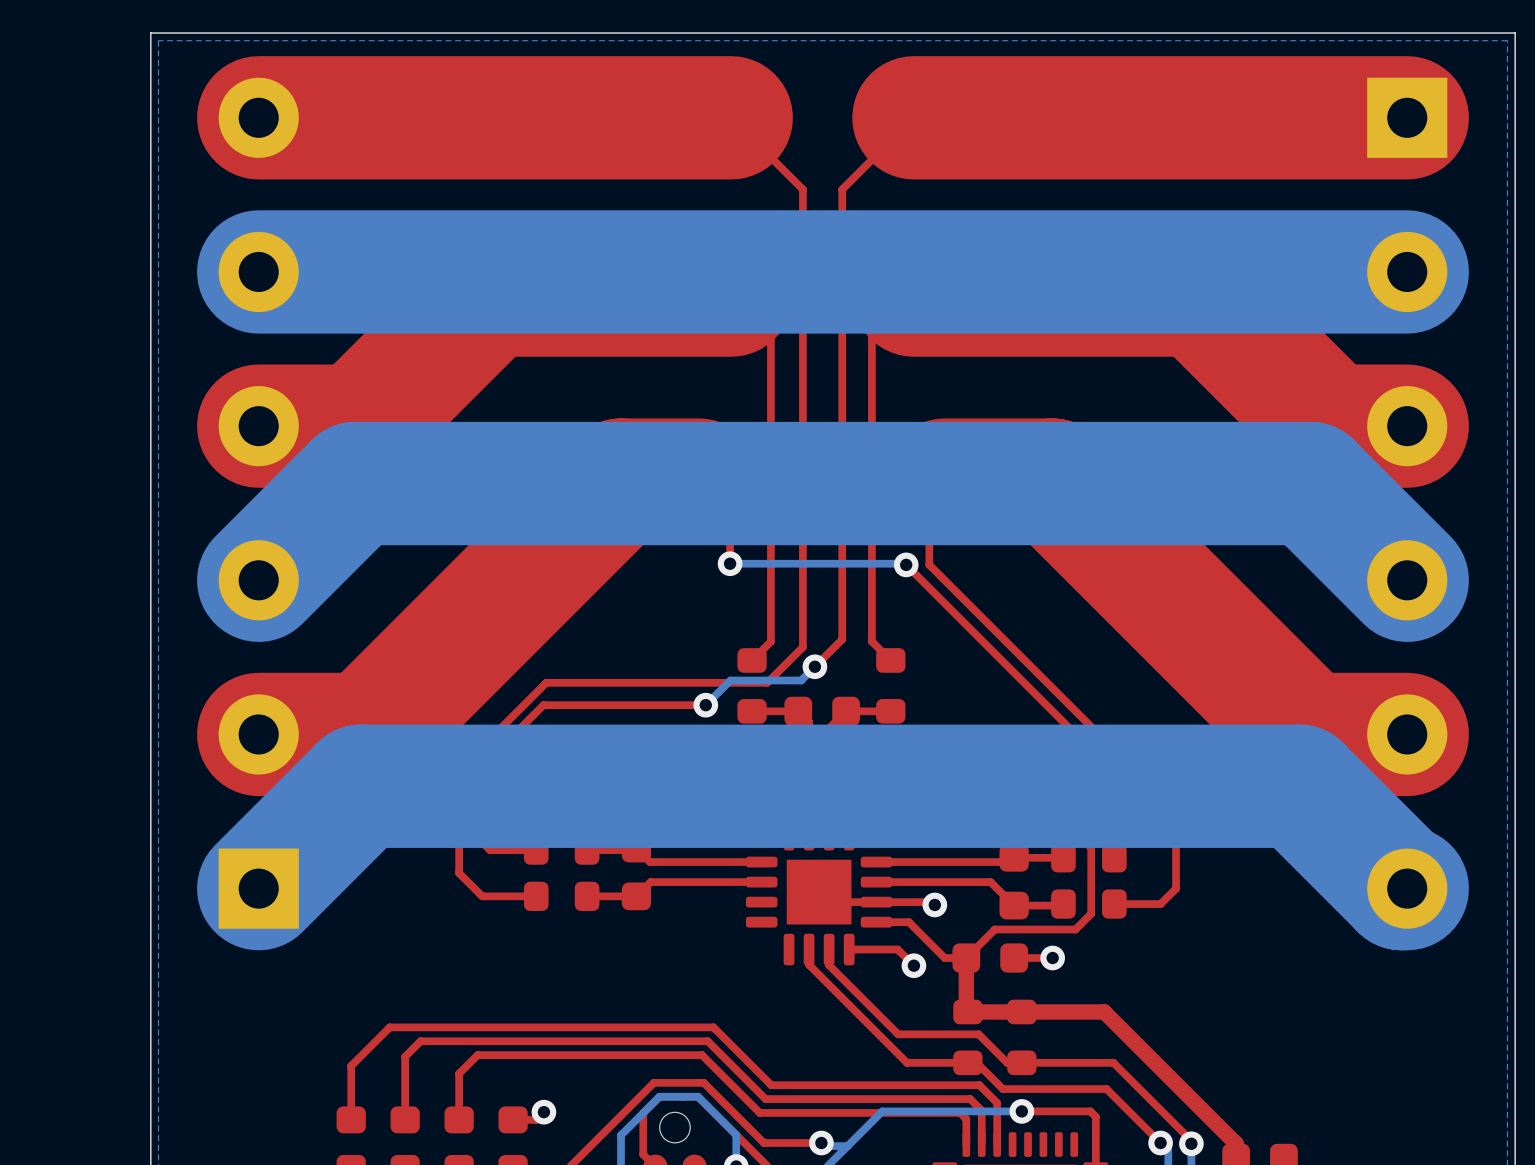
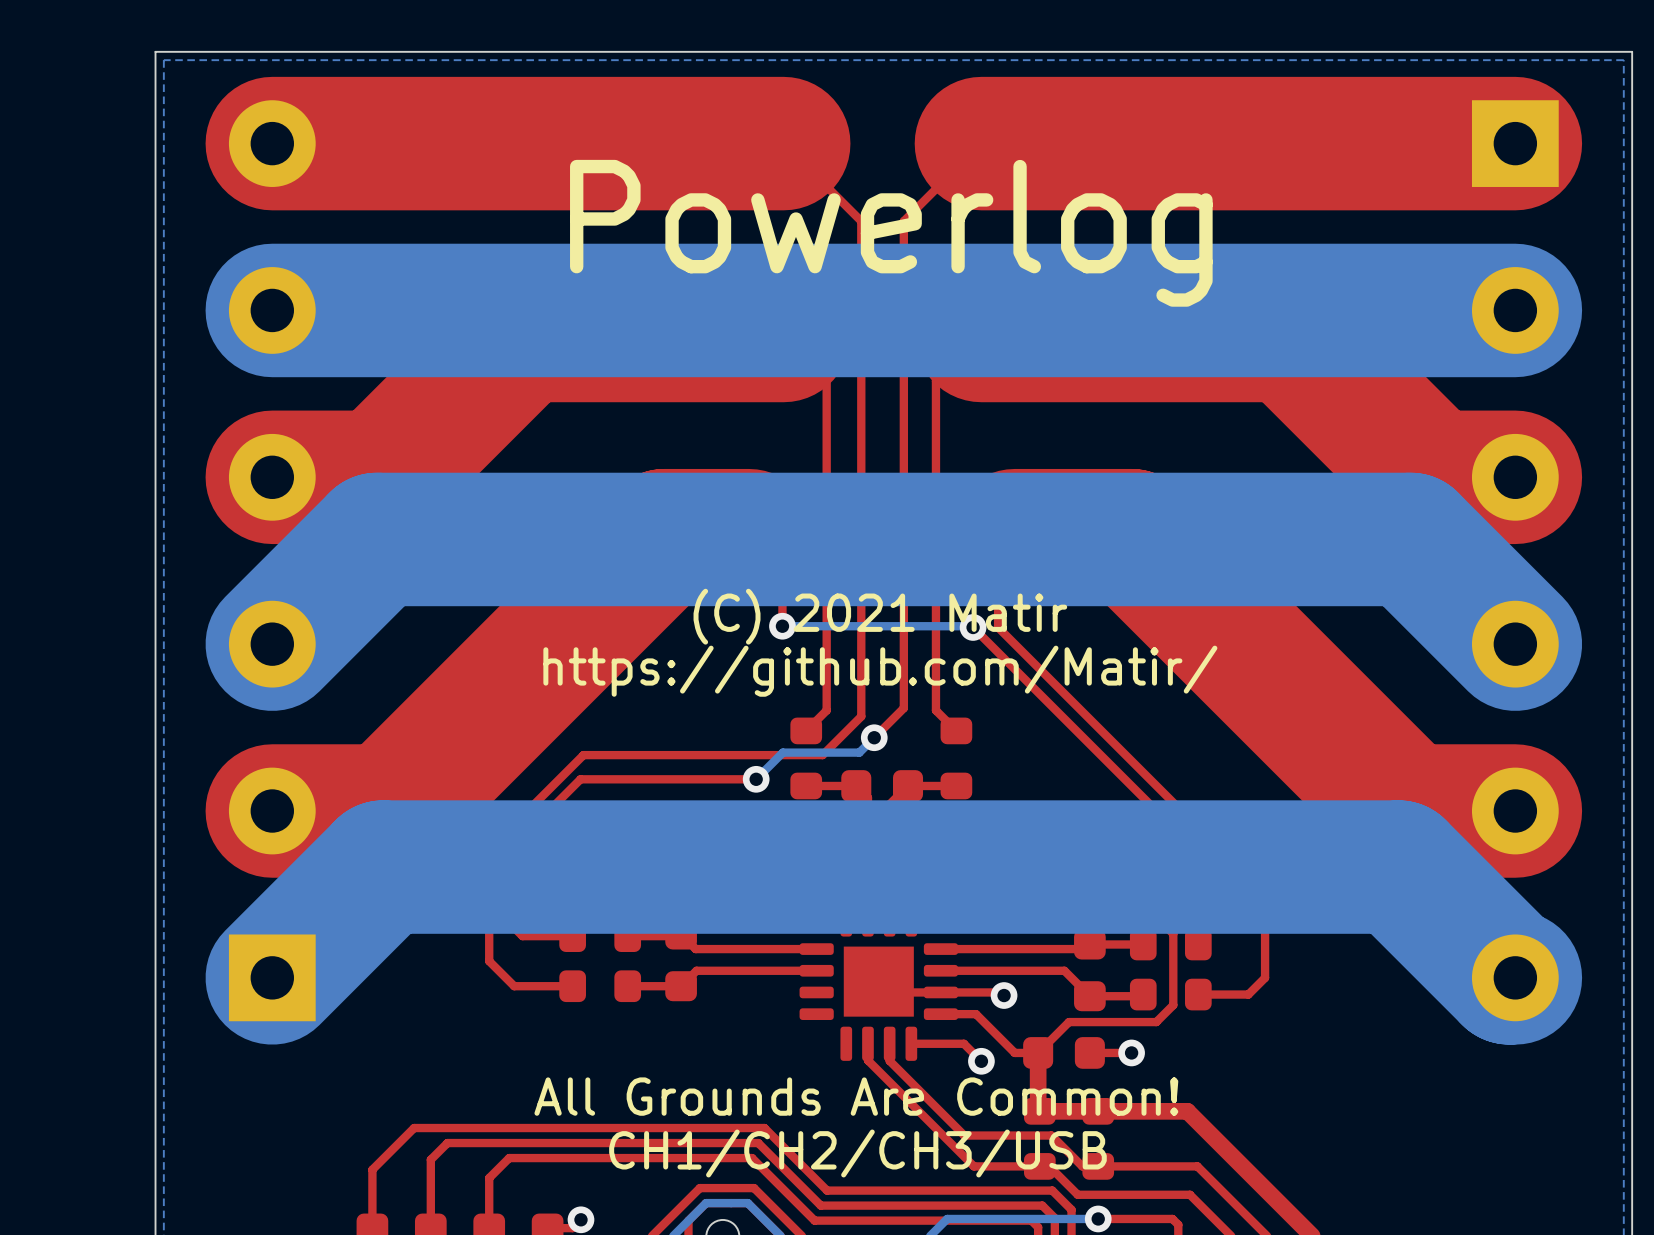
text: none -> Powerlog (891, 233)
text: none -> (C) 2021 Matir (880, 616)
text: none -> https://github.com/Matir/ (880, 671)
text: none -> All Grounds Are Common! (856, 1096)
text: none -> CH1/CH2/CH3/USB (857, 1153)

